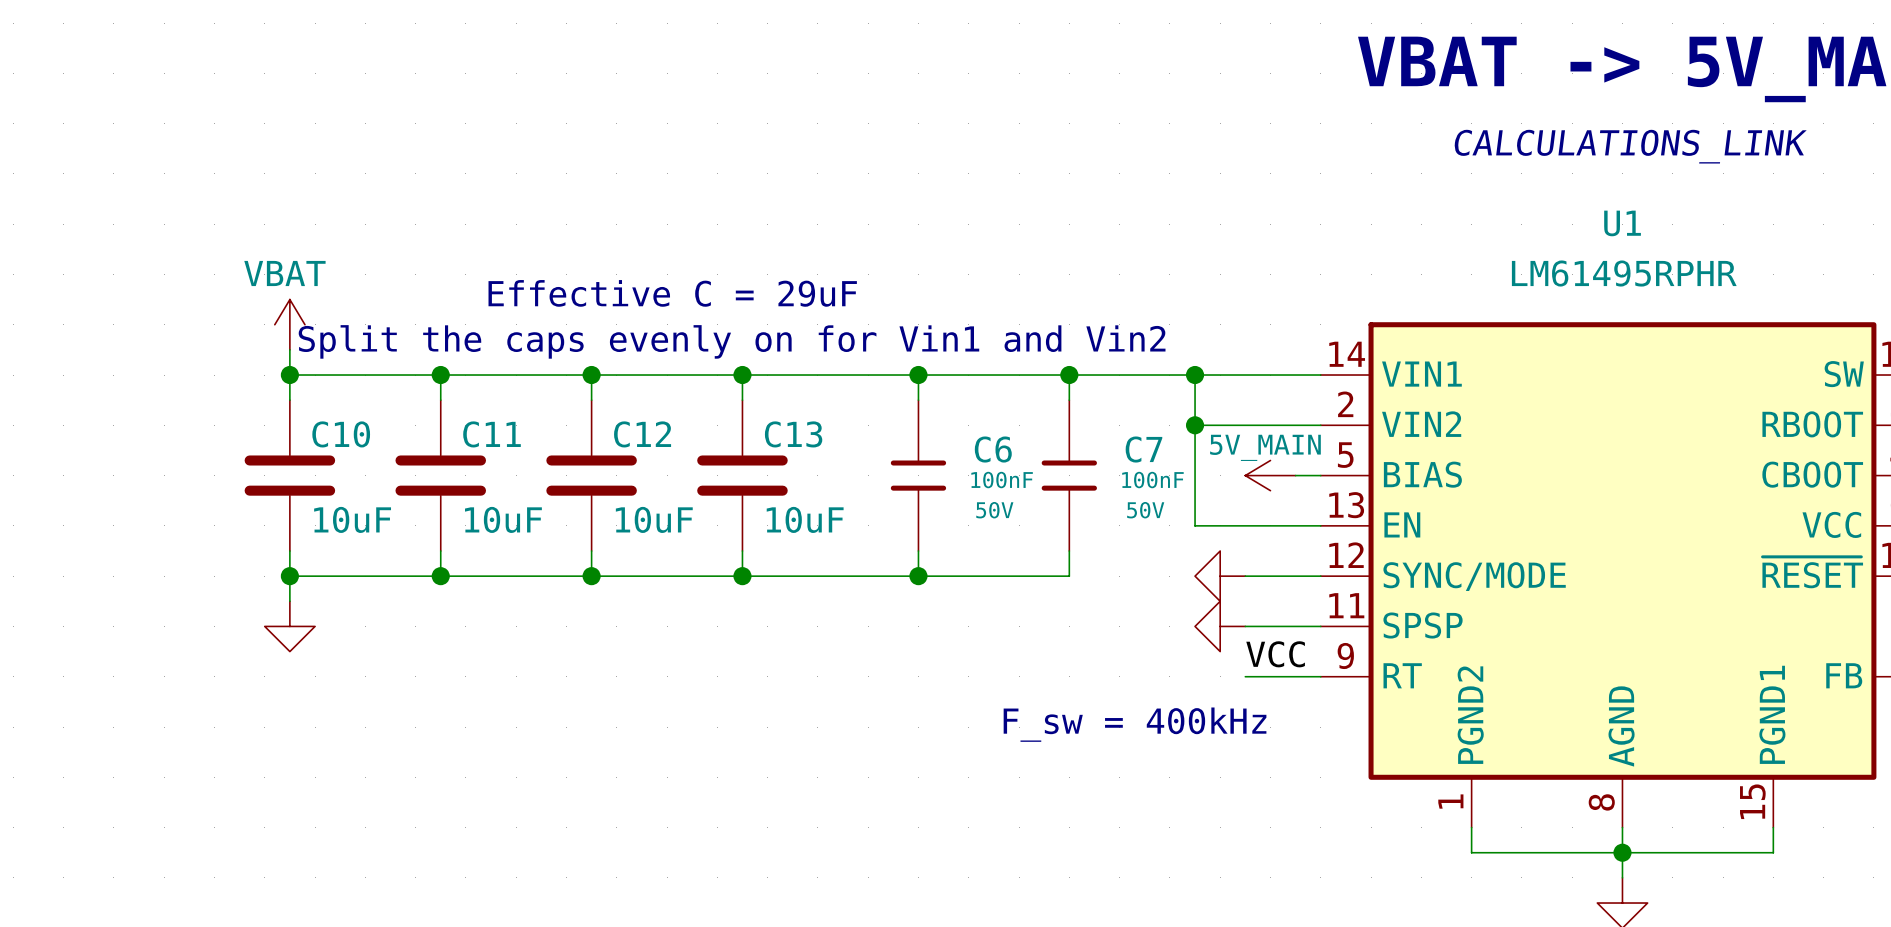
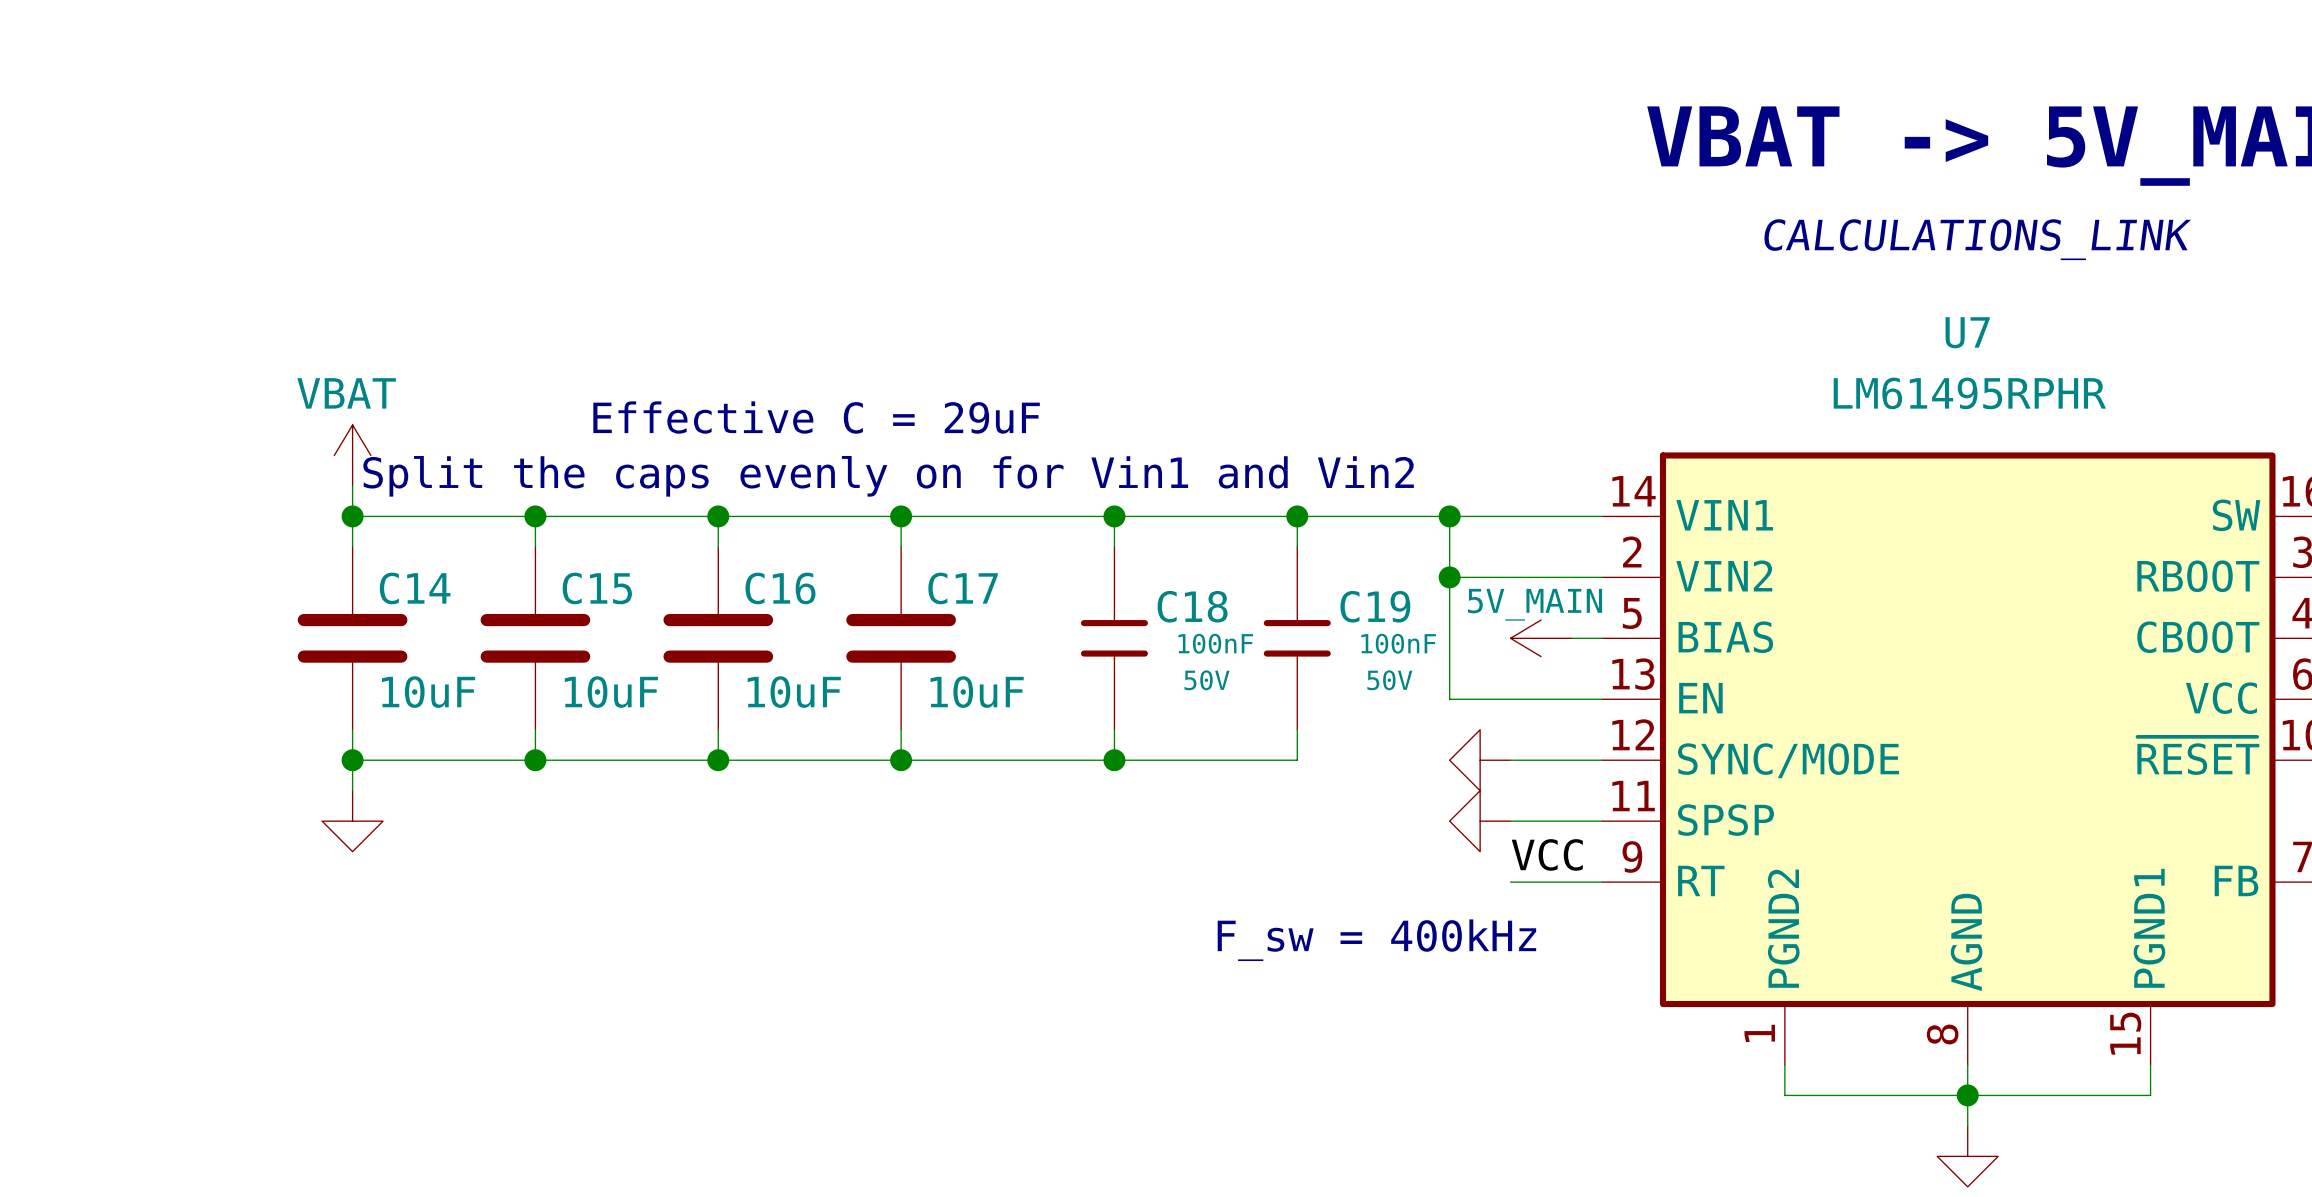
U1 name: U1 (1622, 223) -> U7 (1967, 332)
C10 name: C10 (341, 434) -> C14 (415, 588)
C11 name: C11 (492, 434) -> C15 (597, 588)
C12 name: C12 (642, 434) -> C16 (780, 588)
C13 name: C13 (793, 434) -> C17 (963, 588)
C6 name: C6 (993, 449) -> C18 (1192, 606)
C7 name: C7 (1143, 449) -> C19 (1375, 606)

